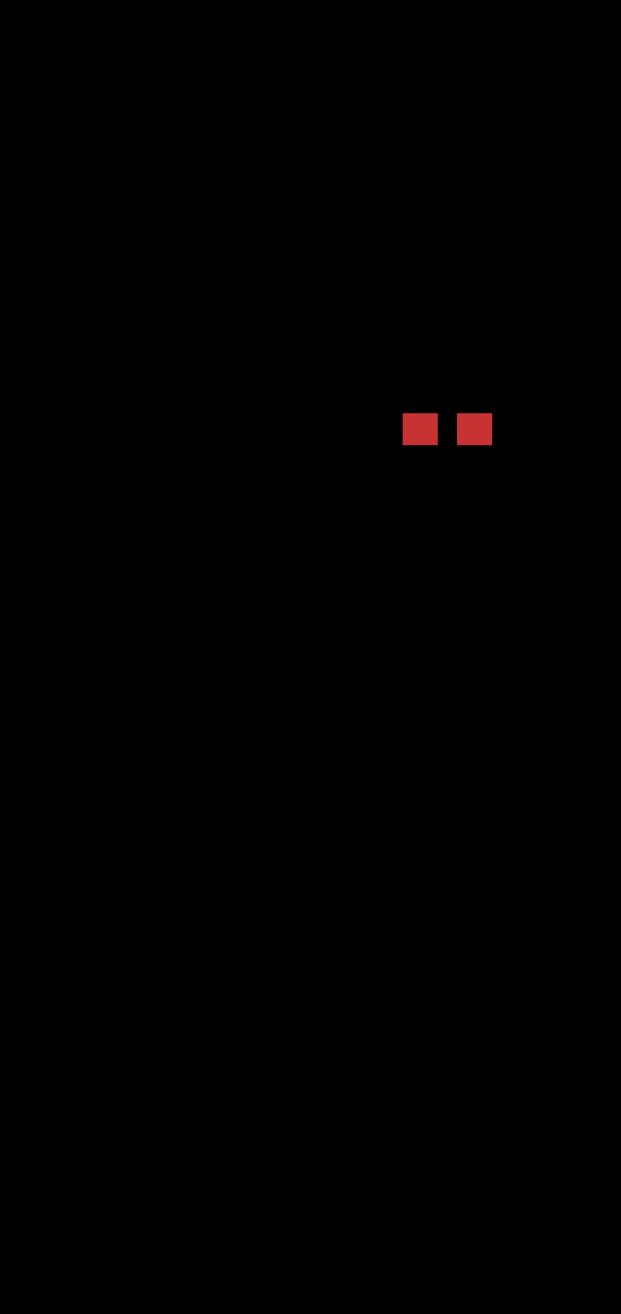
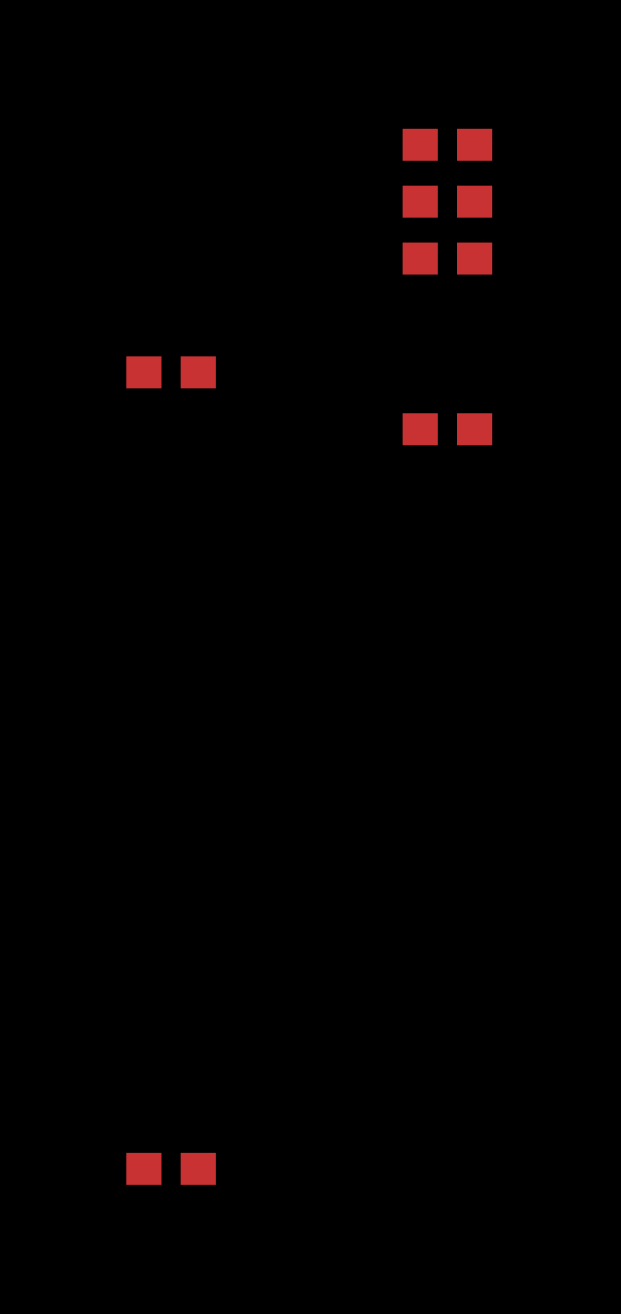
part: none -> (447, 144)
part: none -> (447, 201)
part: none -> (447, 258)
part: none -> (171, 372)
part: none -> (171, 1168)

